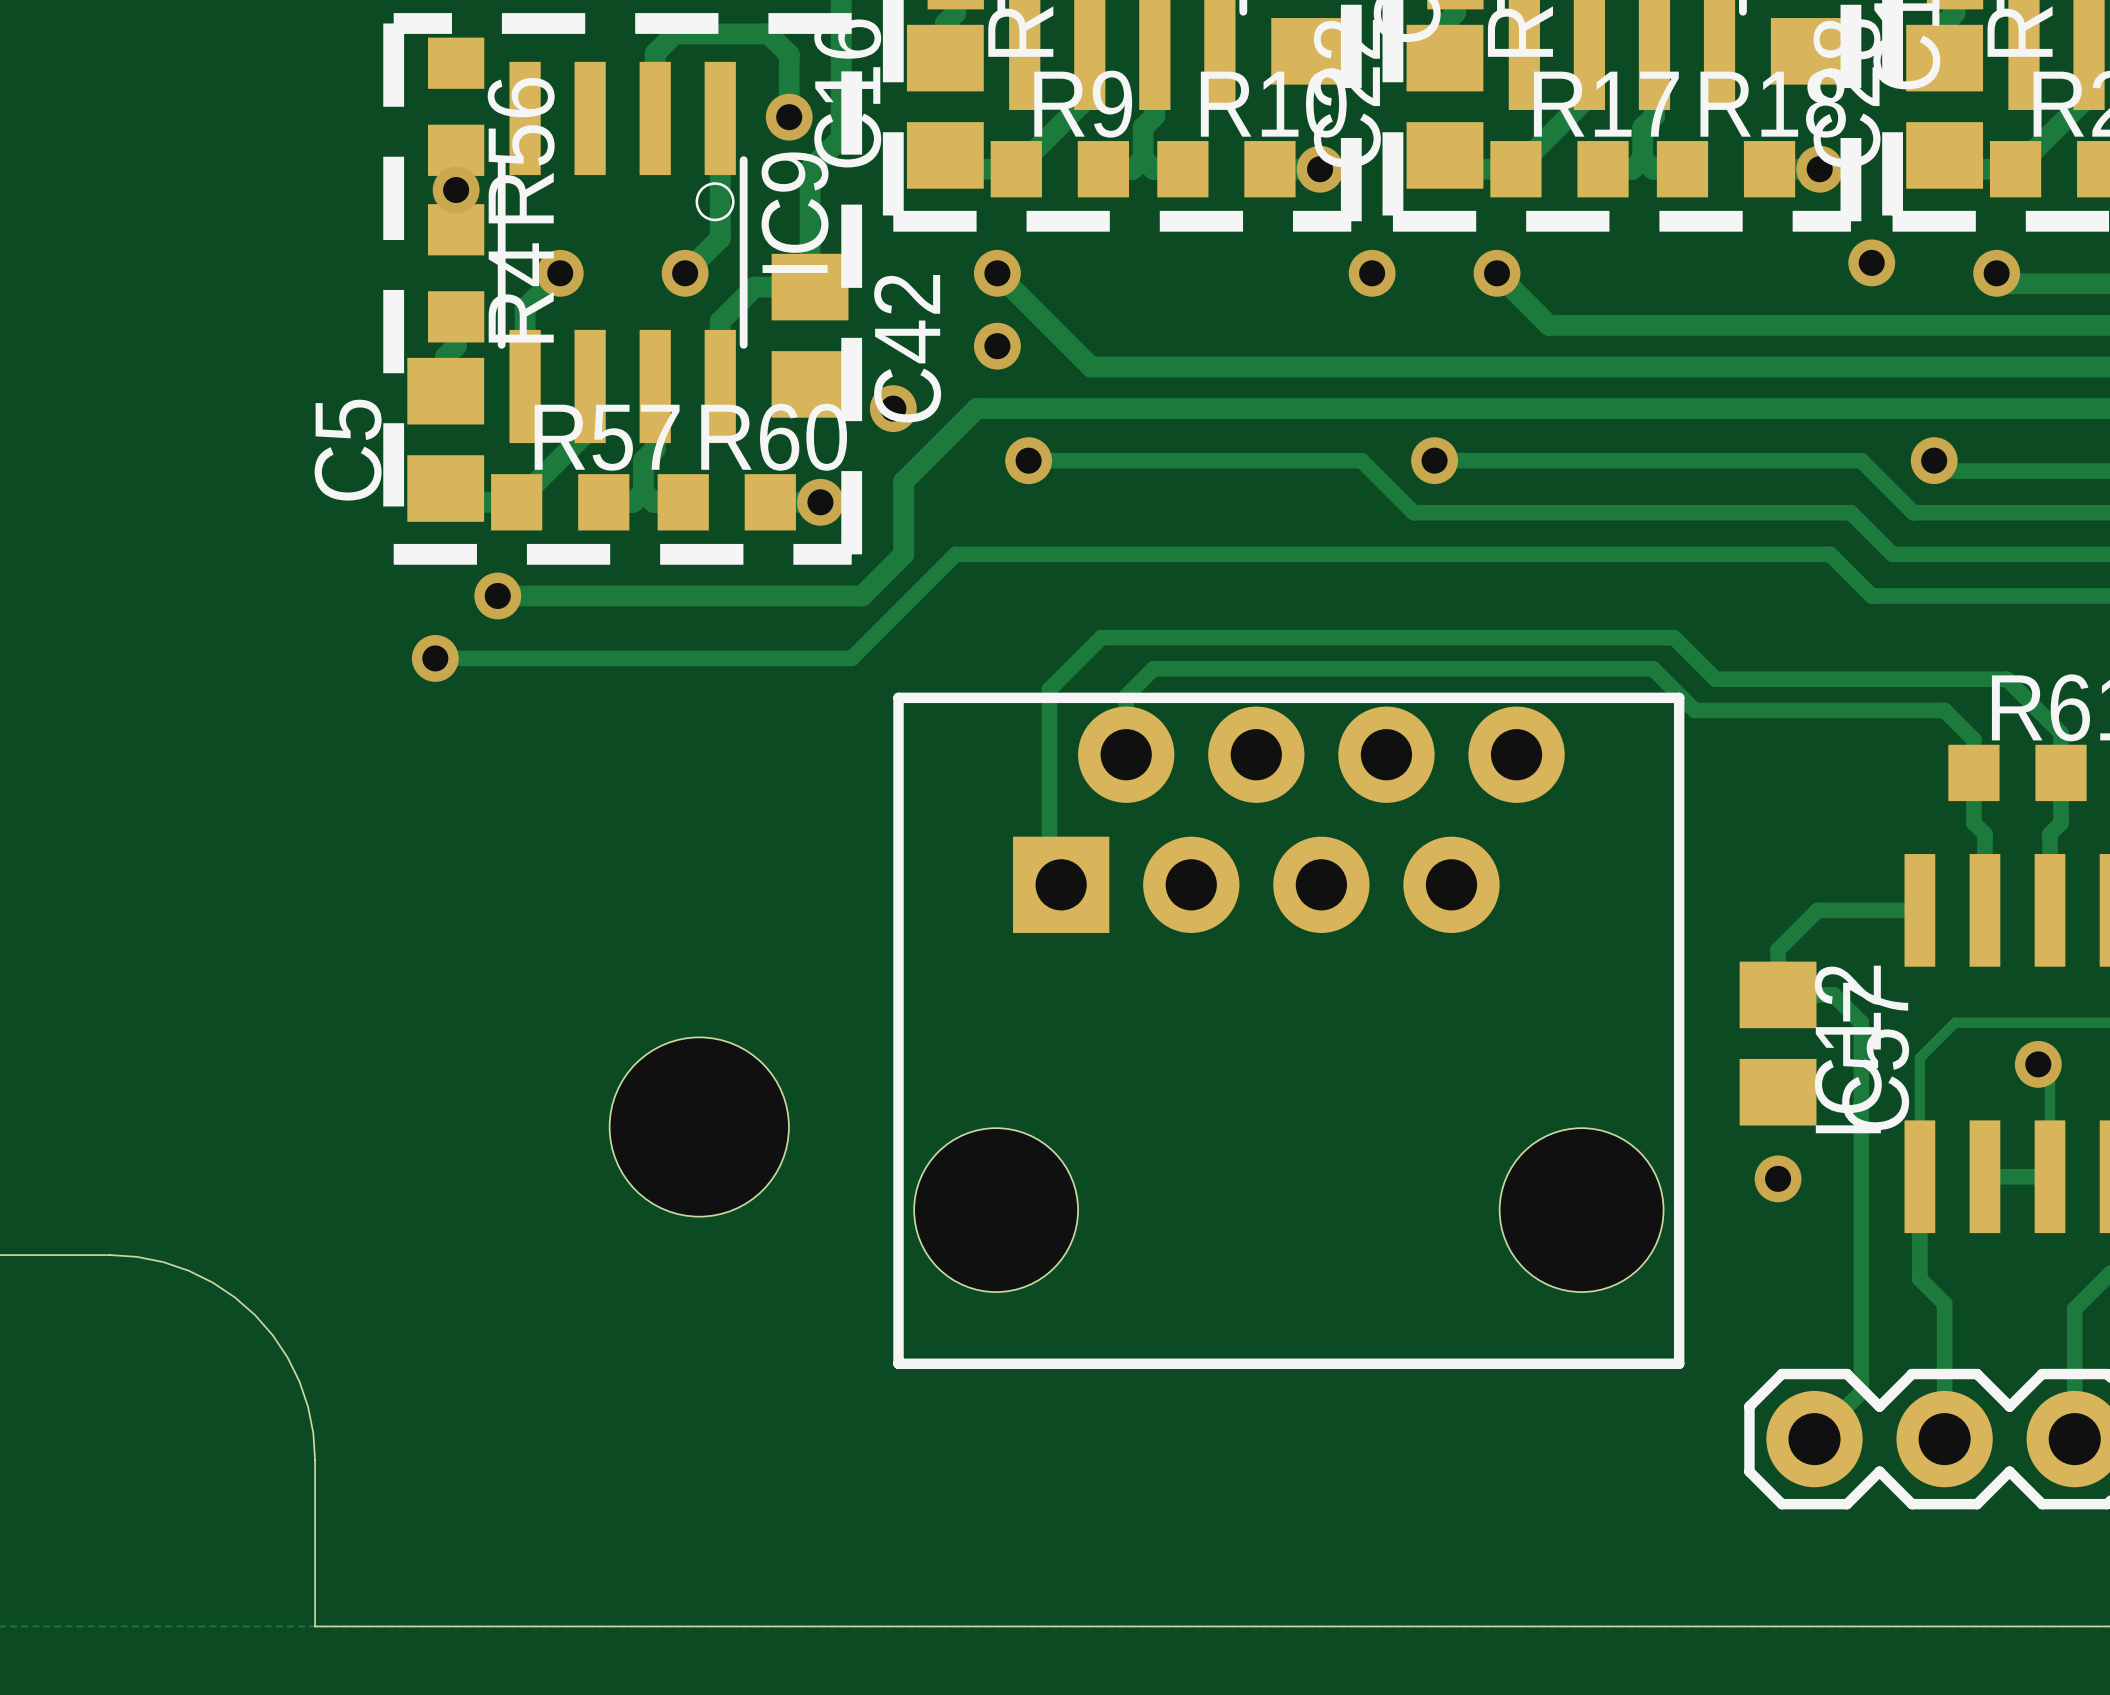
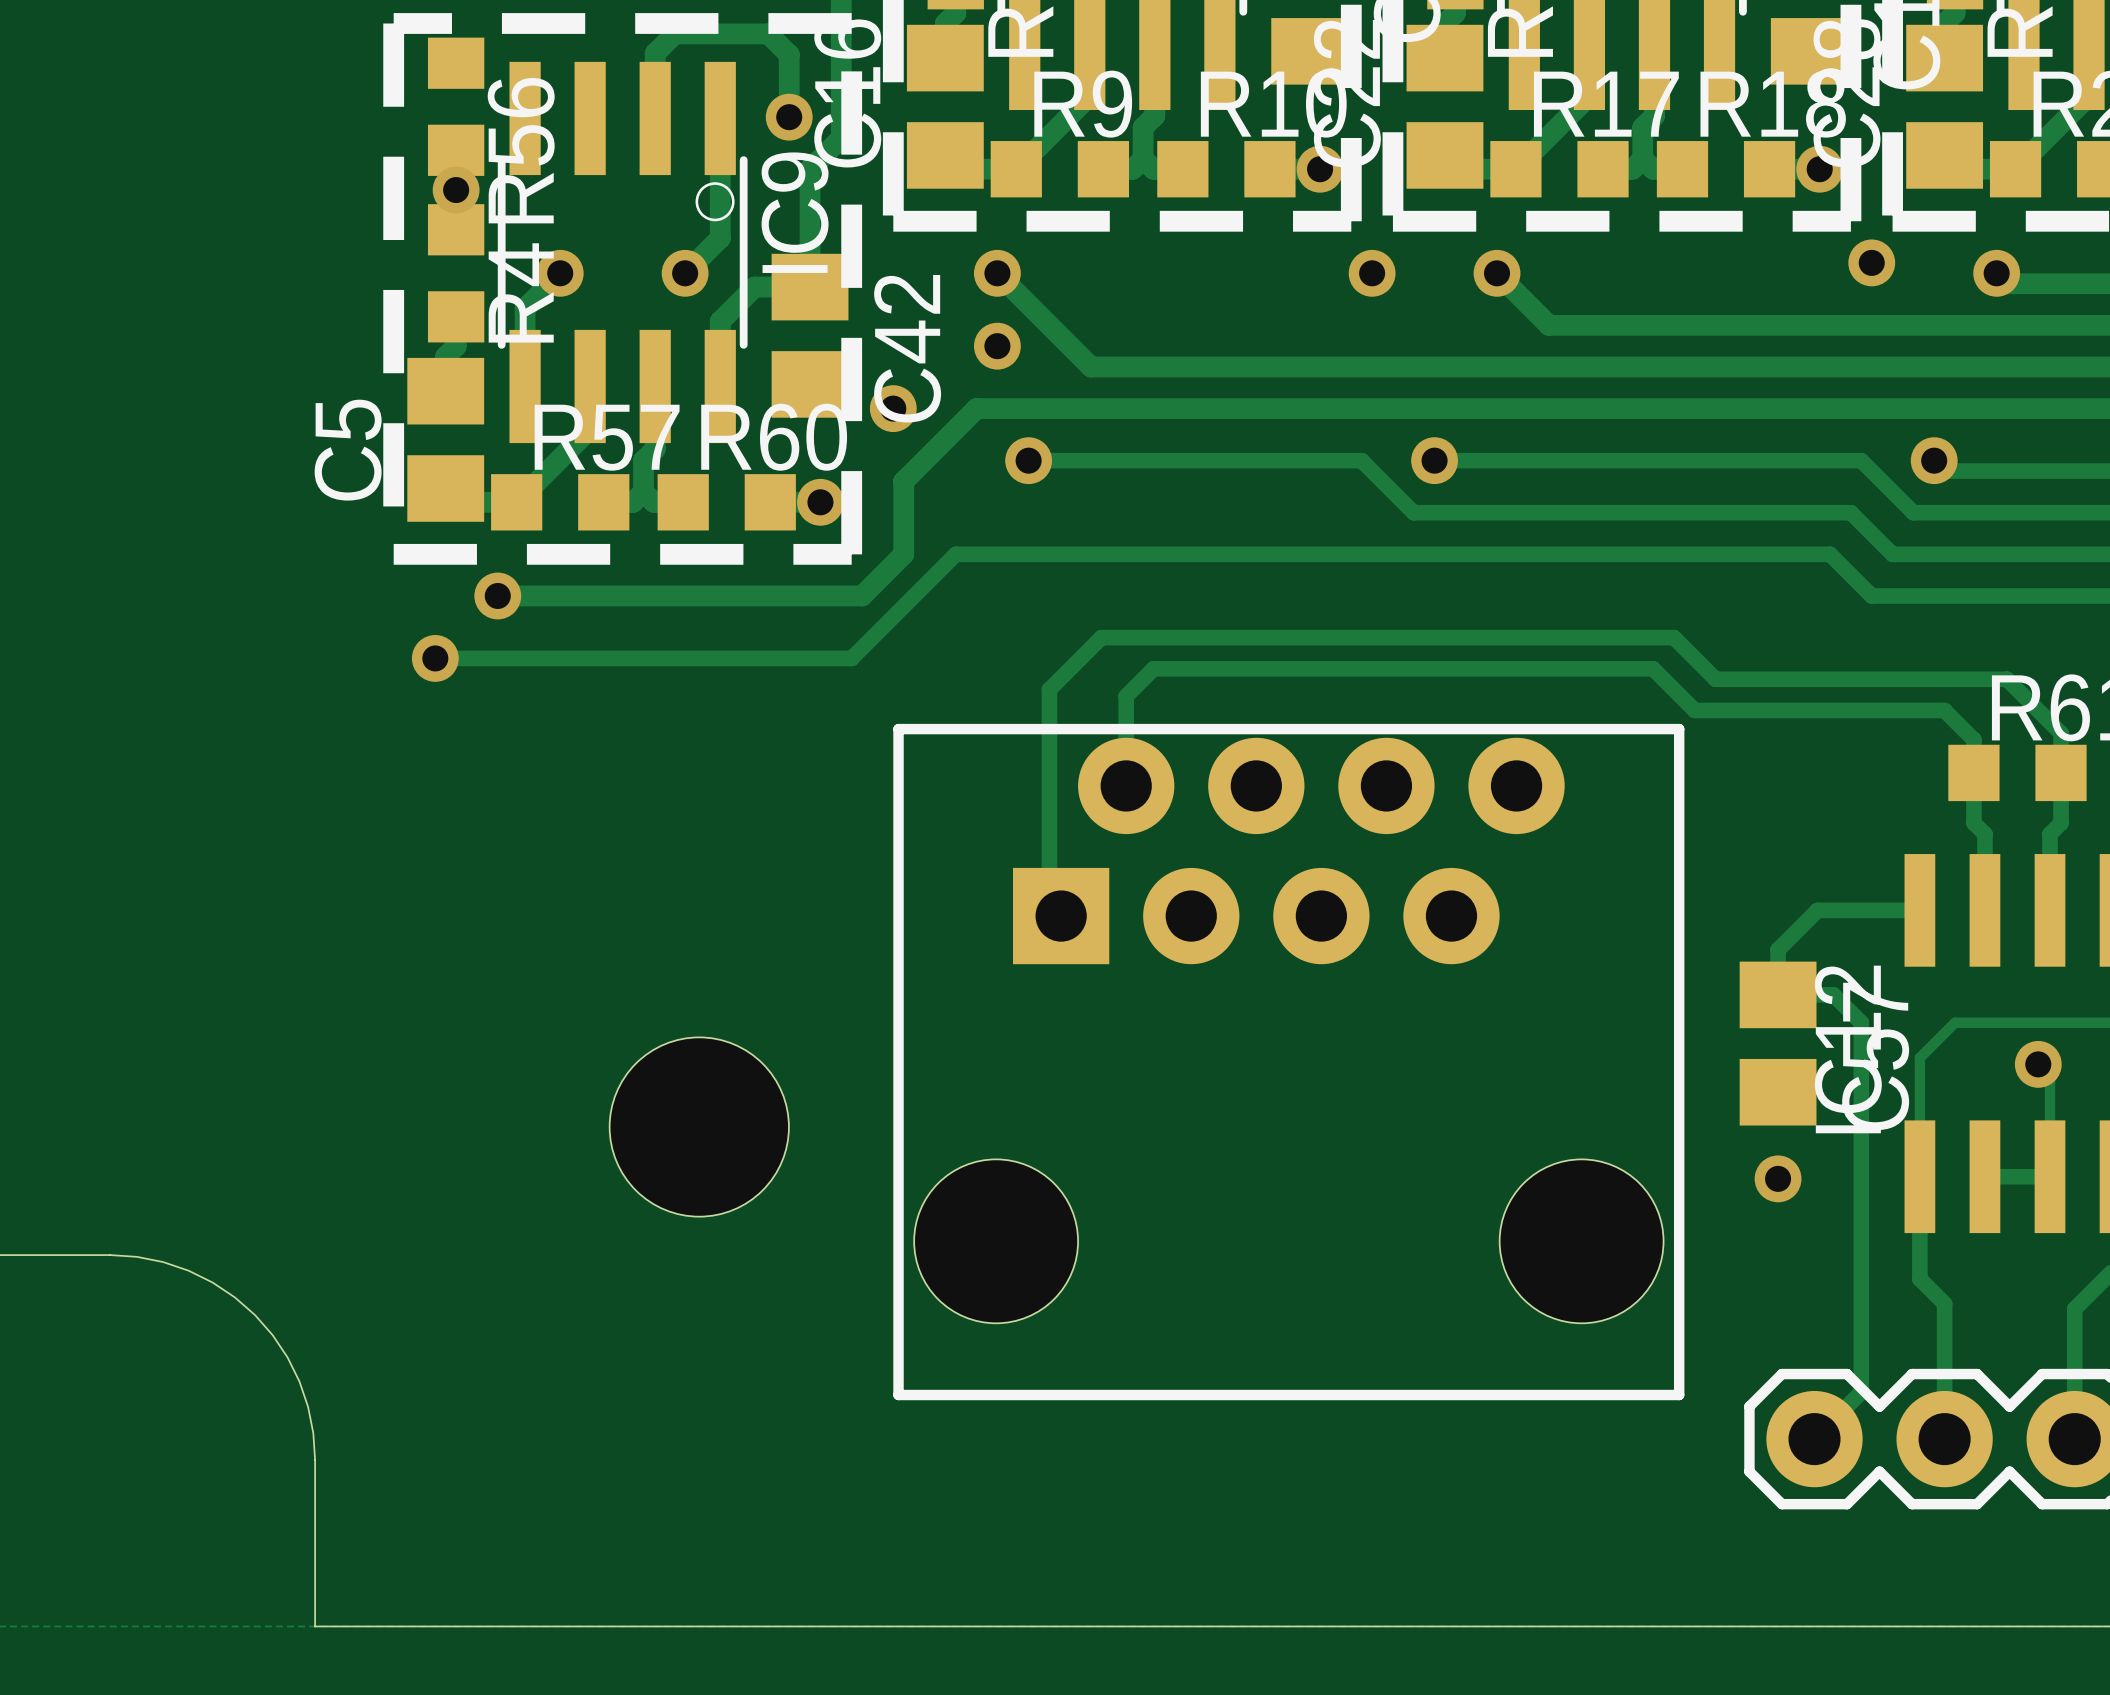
part position: (1288, 1030) -> (1288, 1062)

